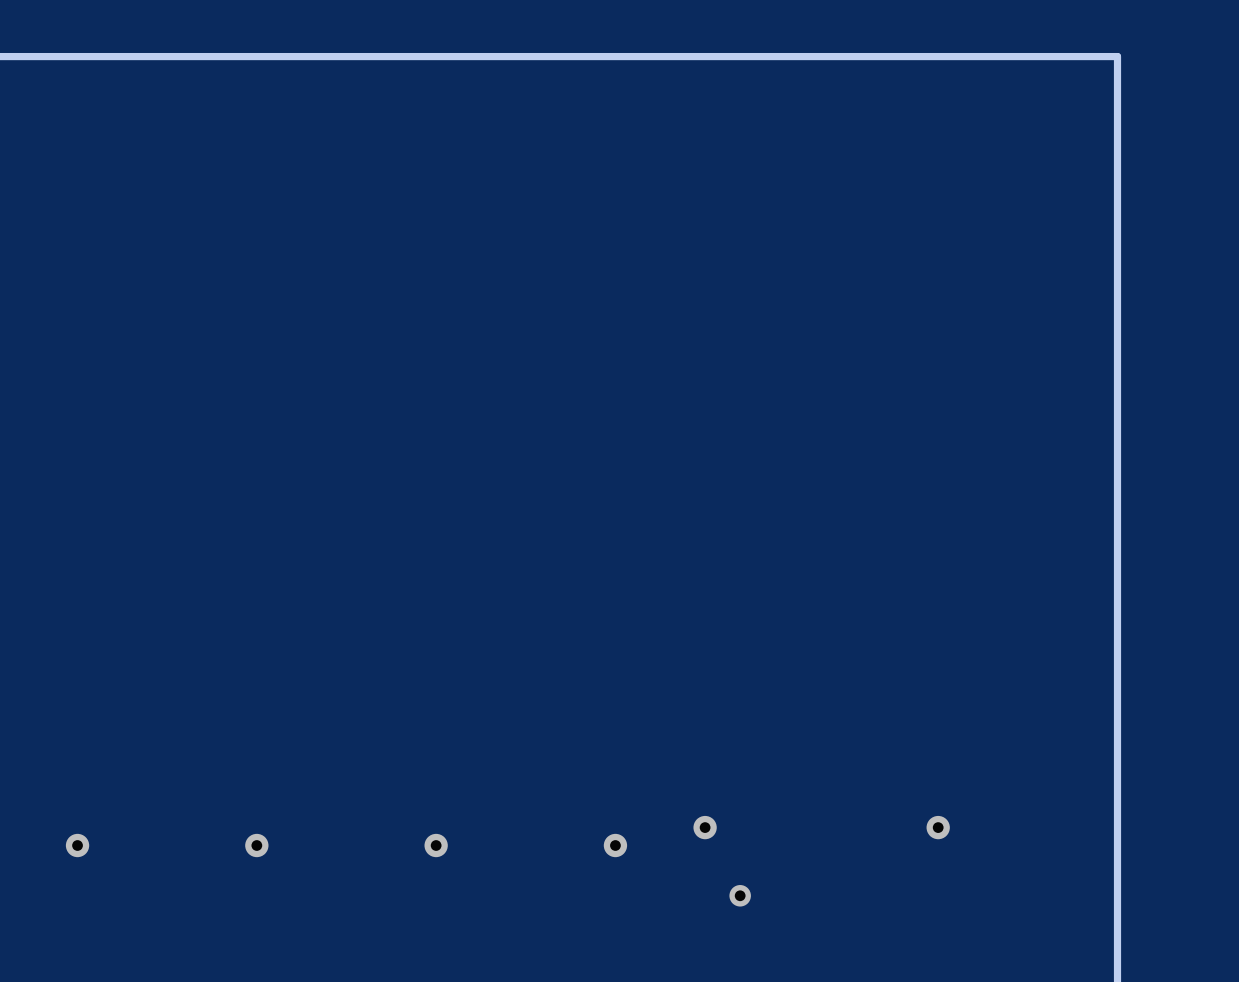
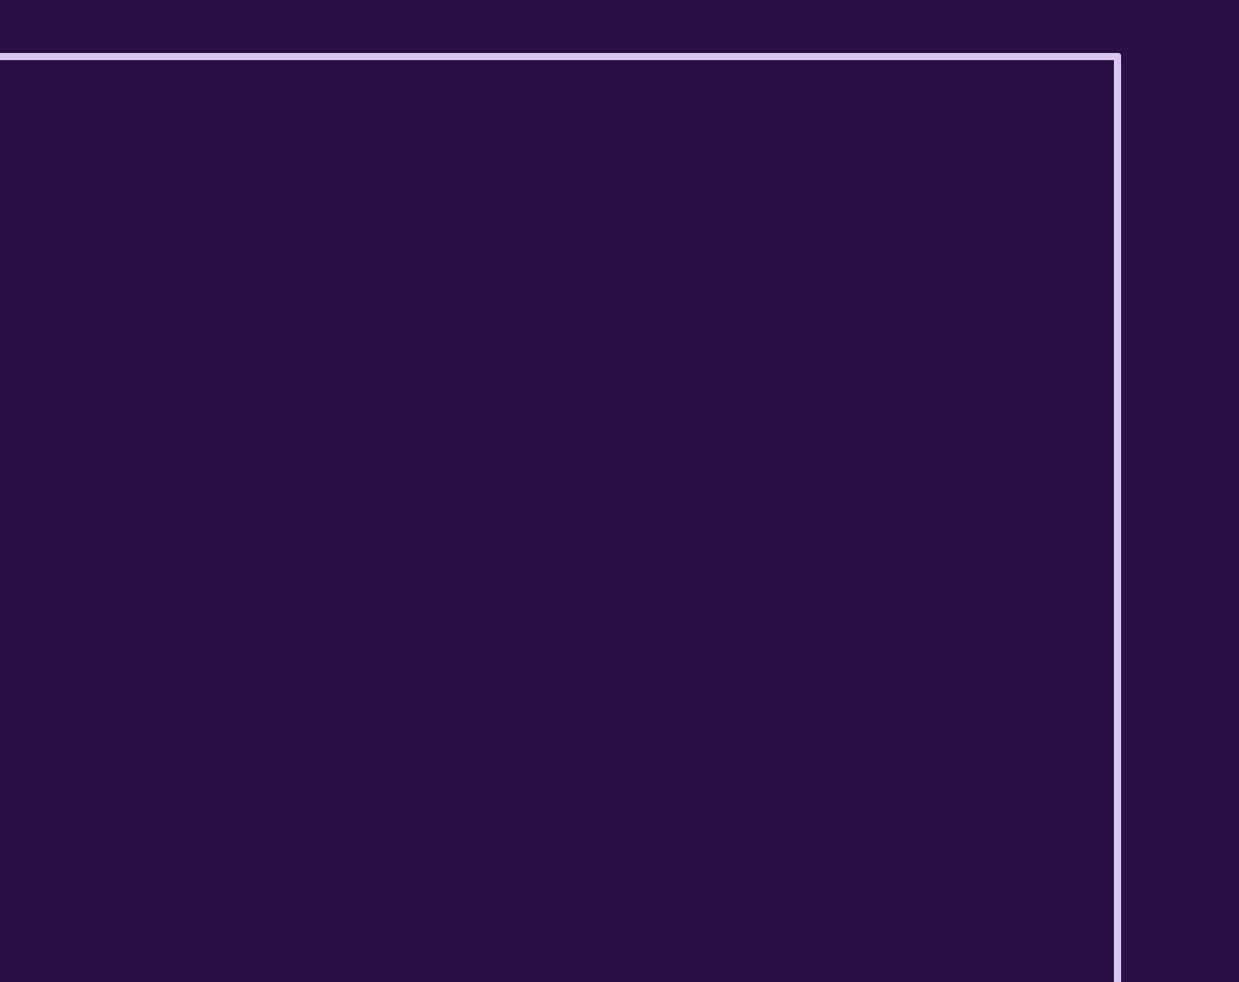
via: (705, 827) -> none
via: (938, 827) -> none
via: (77, 845) -> none
via: (256, 845) -> none
via: (436, 845) -> none
via: (615, 845) -> none
via: (740, 895) -> none

